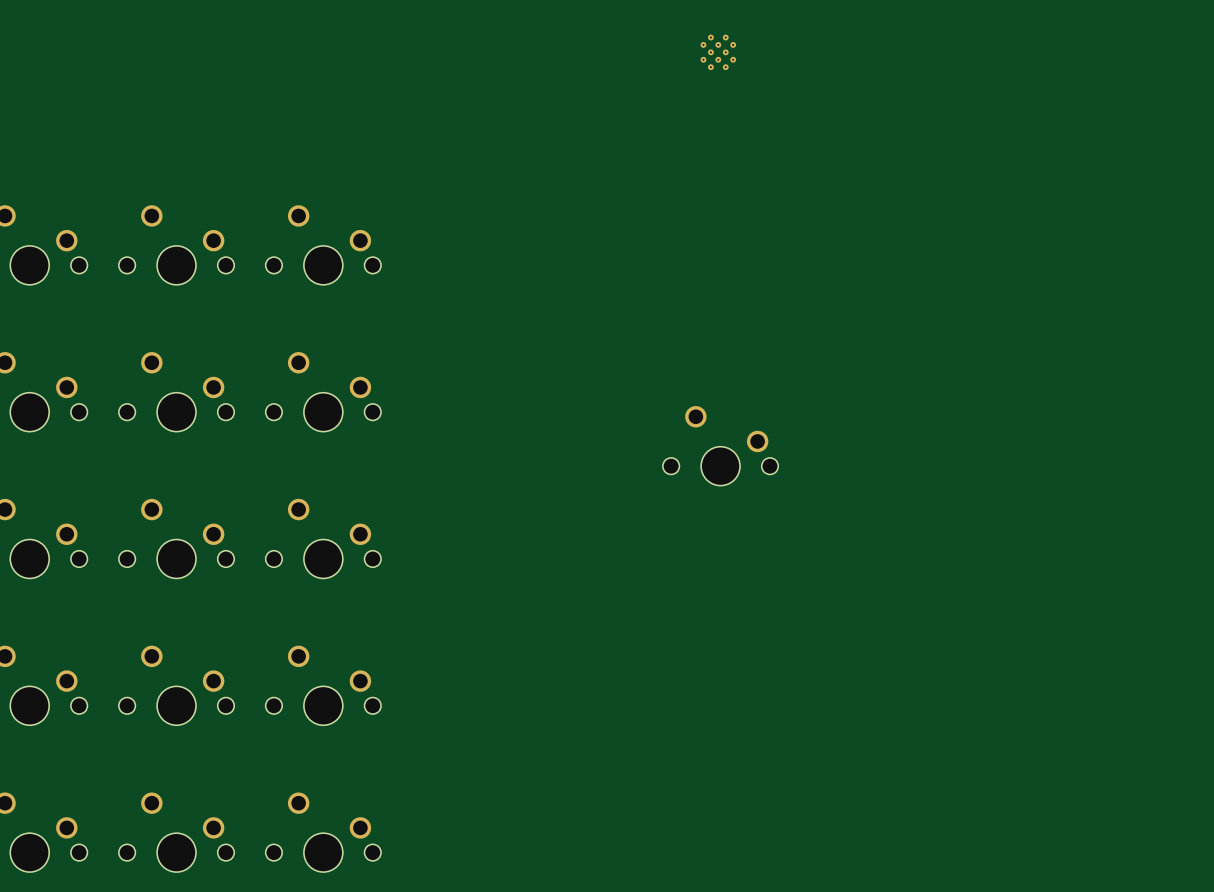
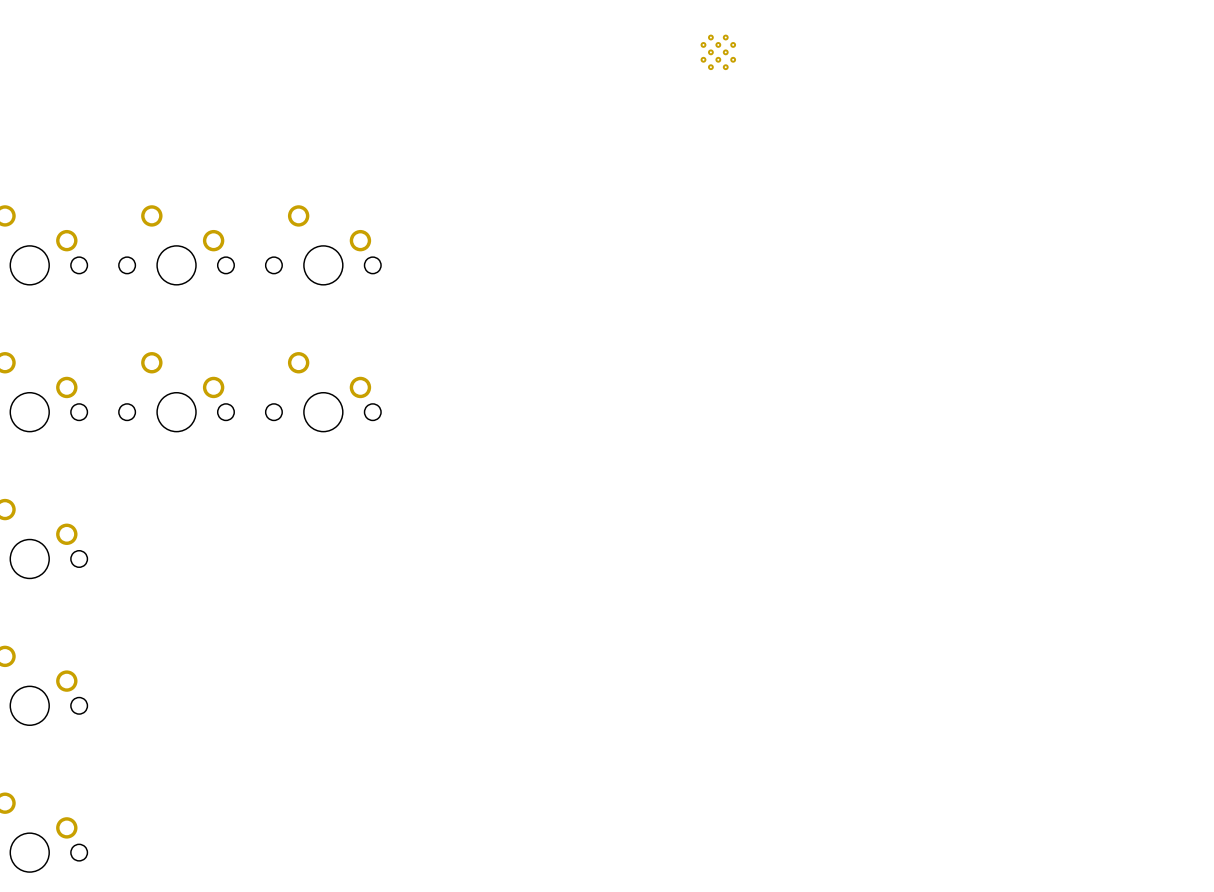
part: (720, 445) -> none
part: (176, 538) -> none
part: (323, 538) -> none
part: (176, 685) -> none
part: (323, 685) -> none
part: (176, 832) -> none
part: (323, 832) -> none

